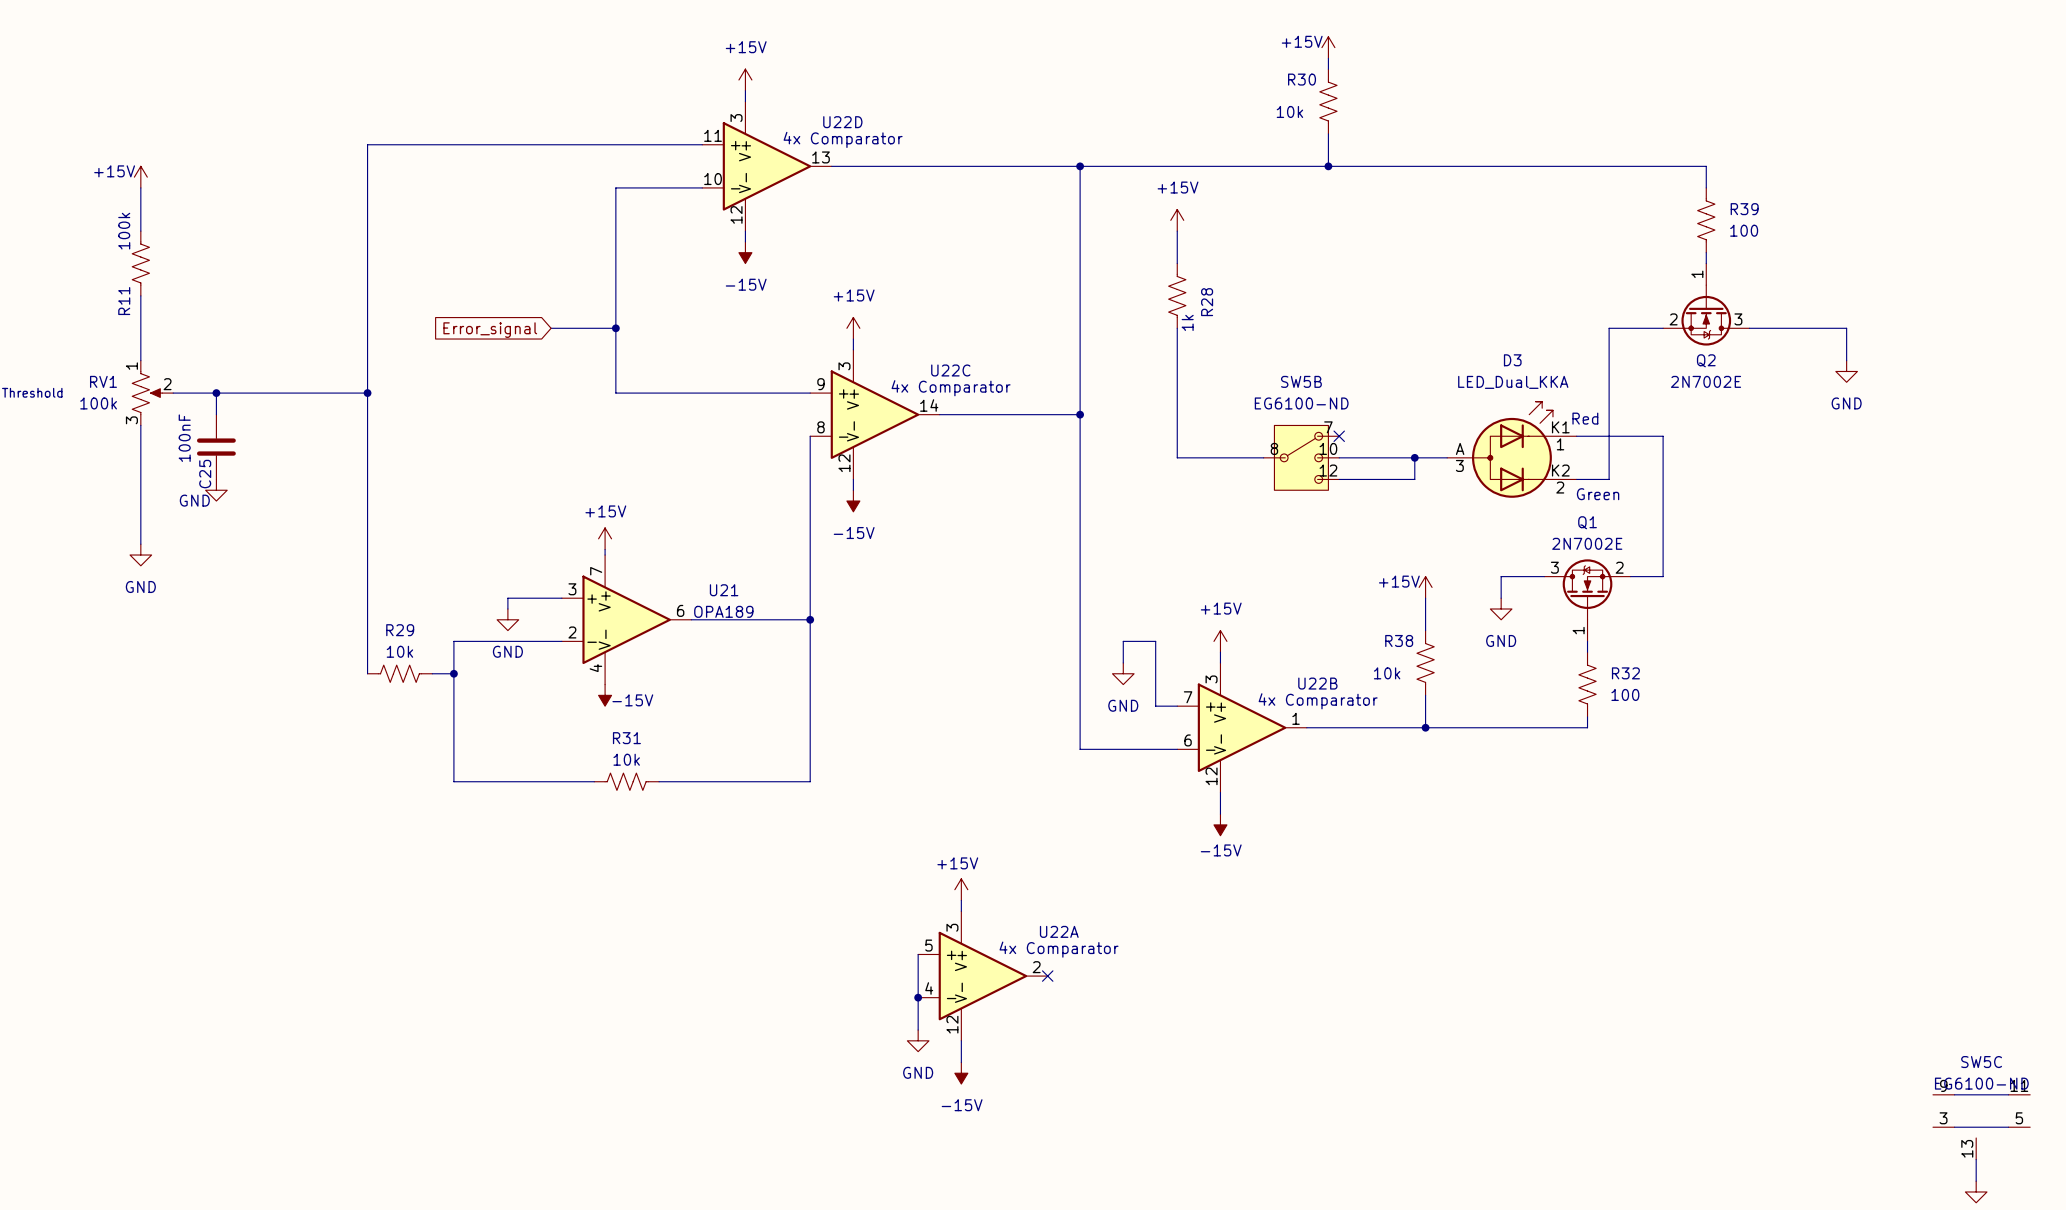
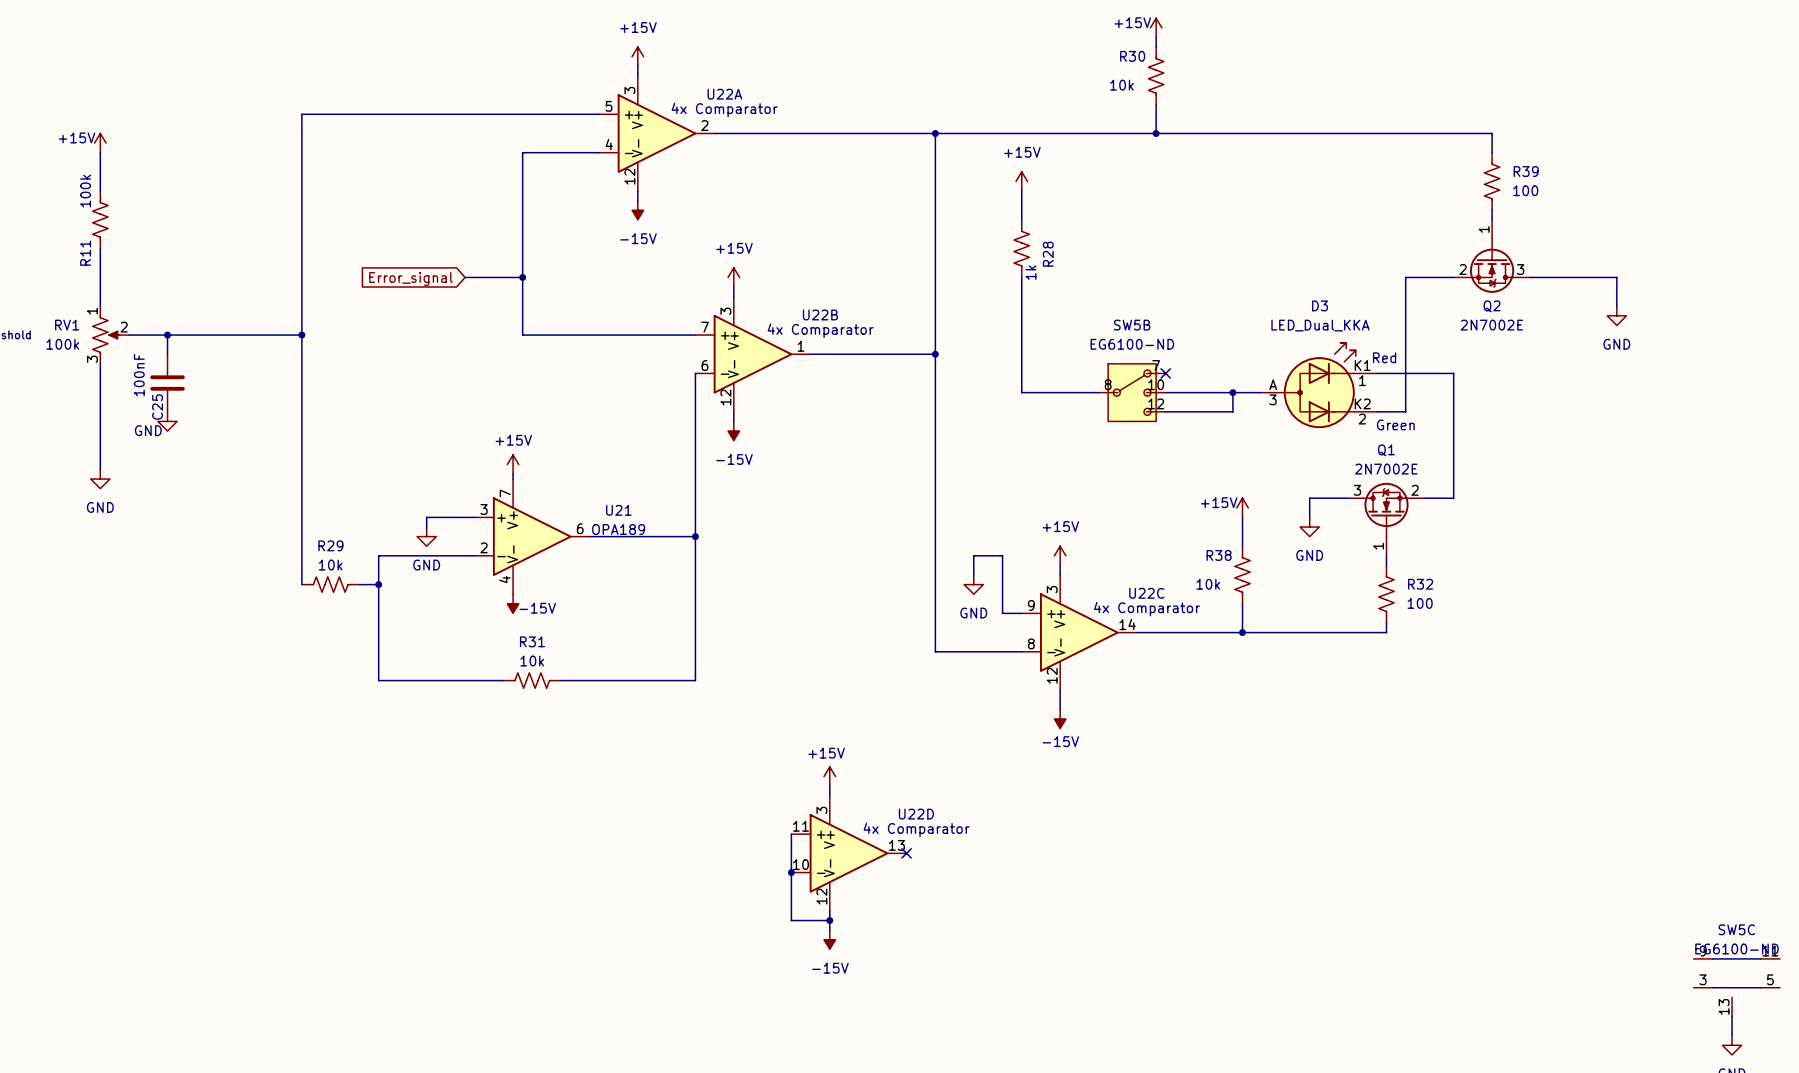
U22D position: (767, 166) -> (848, 853)
U22C position: (874, 414) -> (1079, 632)
U22B position: (1242, 727) -> (753, 354)
U22A position: (982, 976) -> (657, 133)
wire: none -> (791, 901) (791, 920) (829, 920)
power symbol: GND (918, 1040) -> none
junction: none -> (829, 920)

